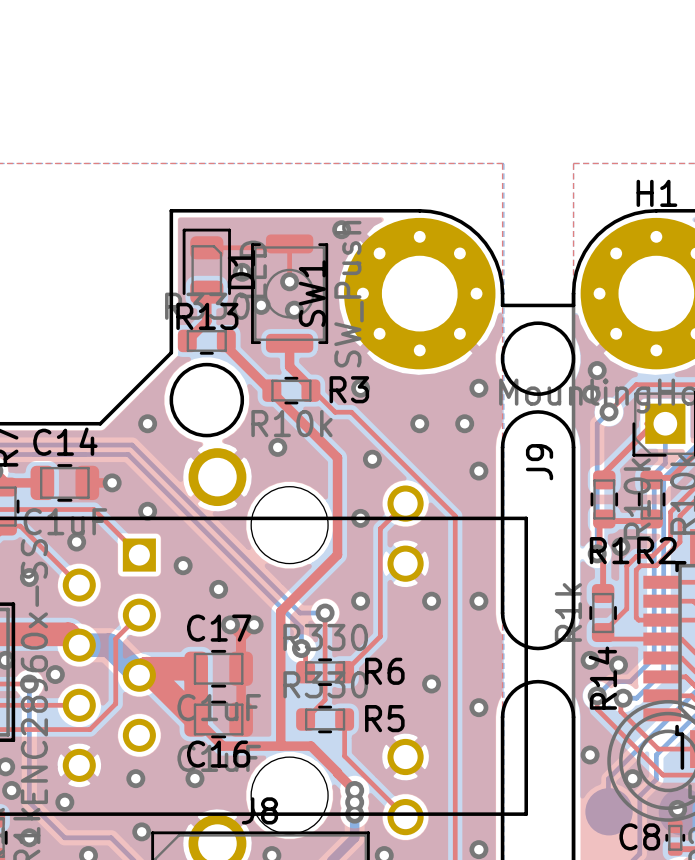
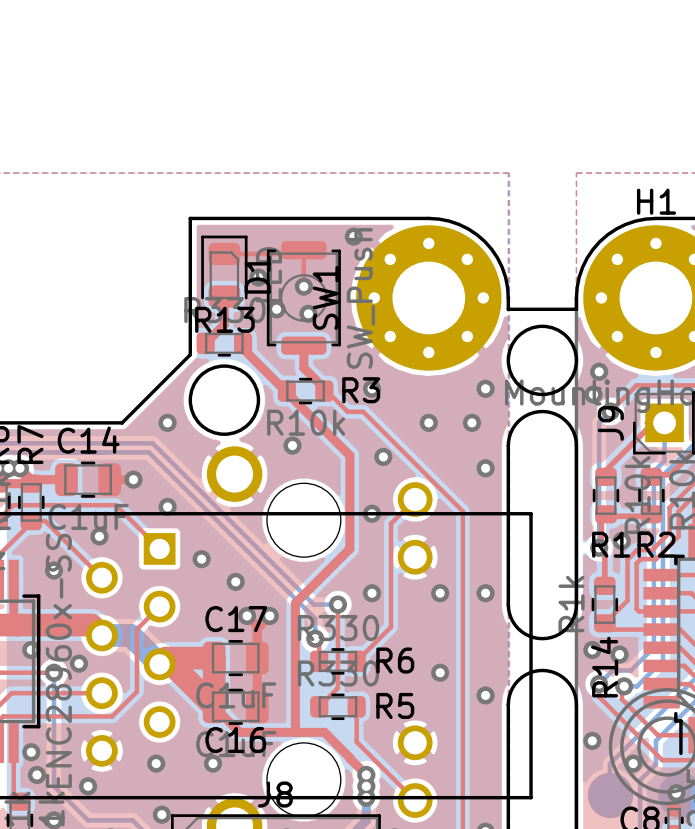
J9 name position: J9 (539, 462) -> J9 (610, 423)

